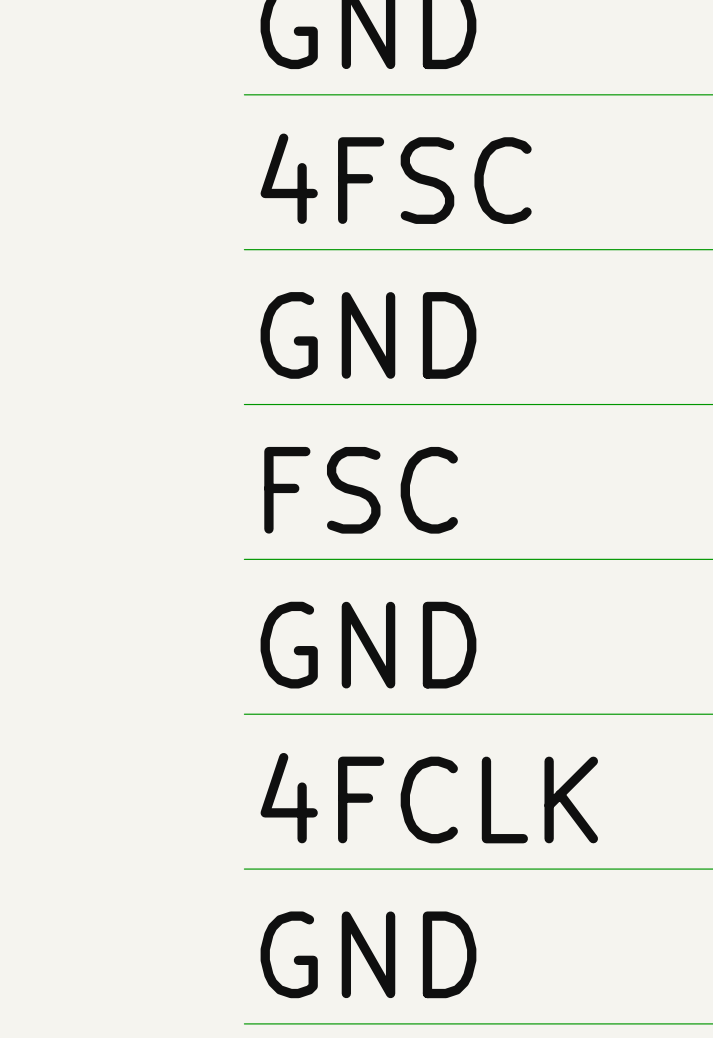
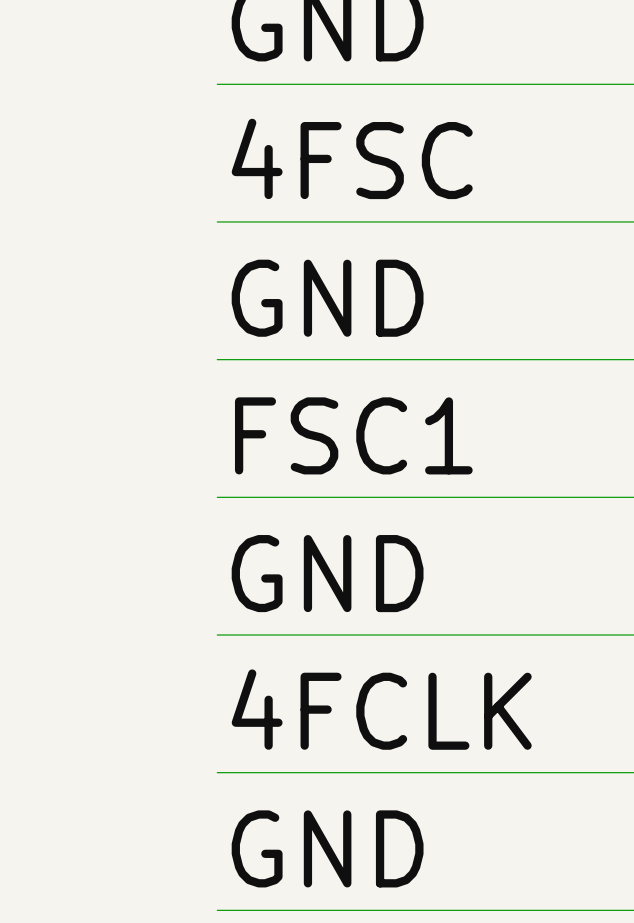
label: FSC (361, 490) -> FSC1 (353, 435)

